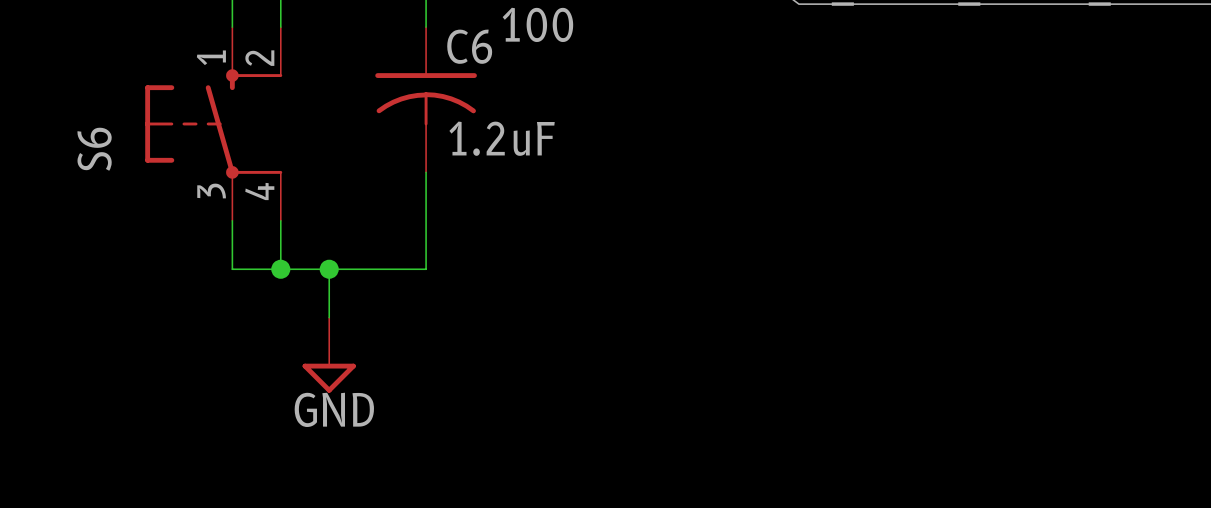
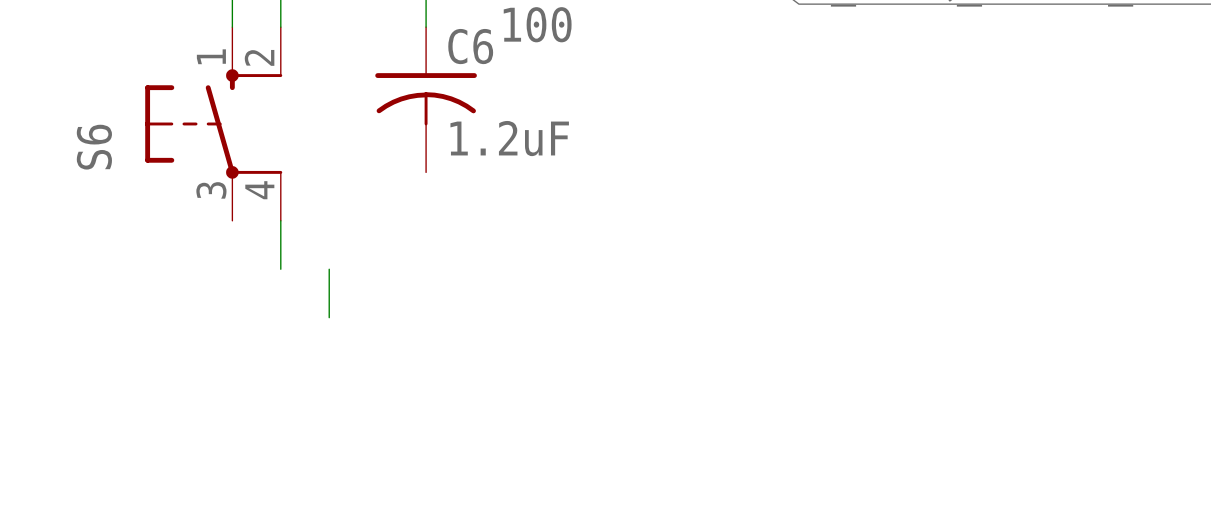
wire: (426, 172) (426, 269) (232, 269) (232, 220) -> none
junction: (280, 269) -> none
junction: (329, 269) -> none
power symbol: GND (329, 355) -> none

